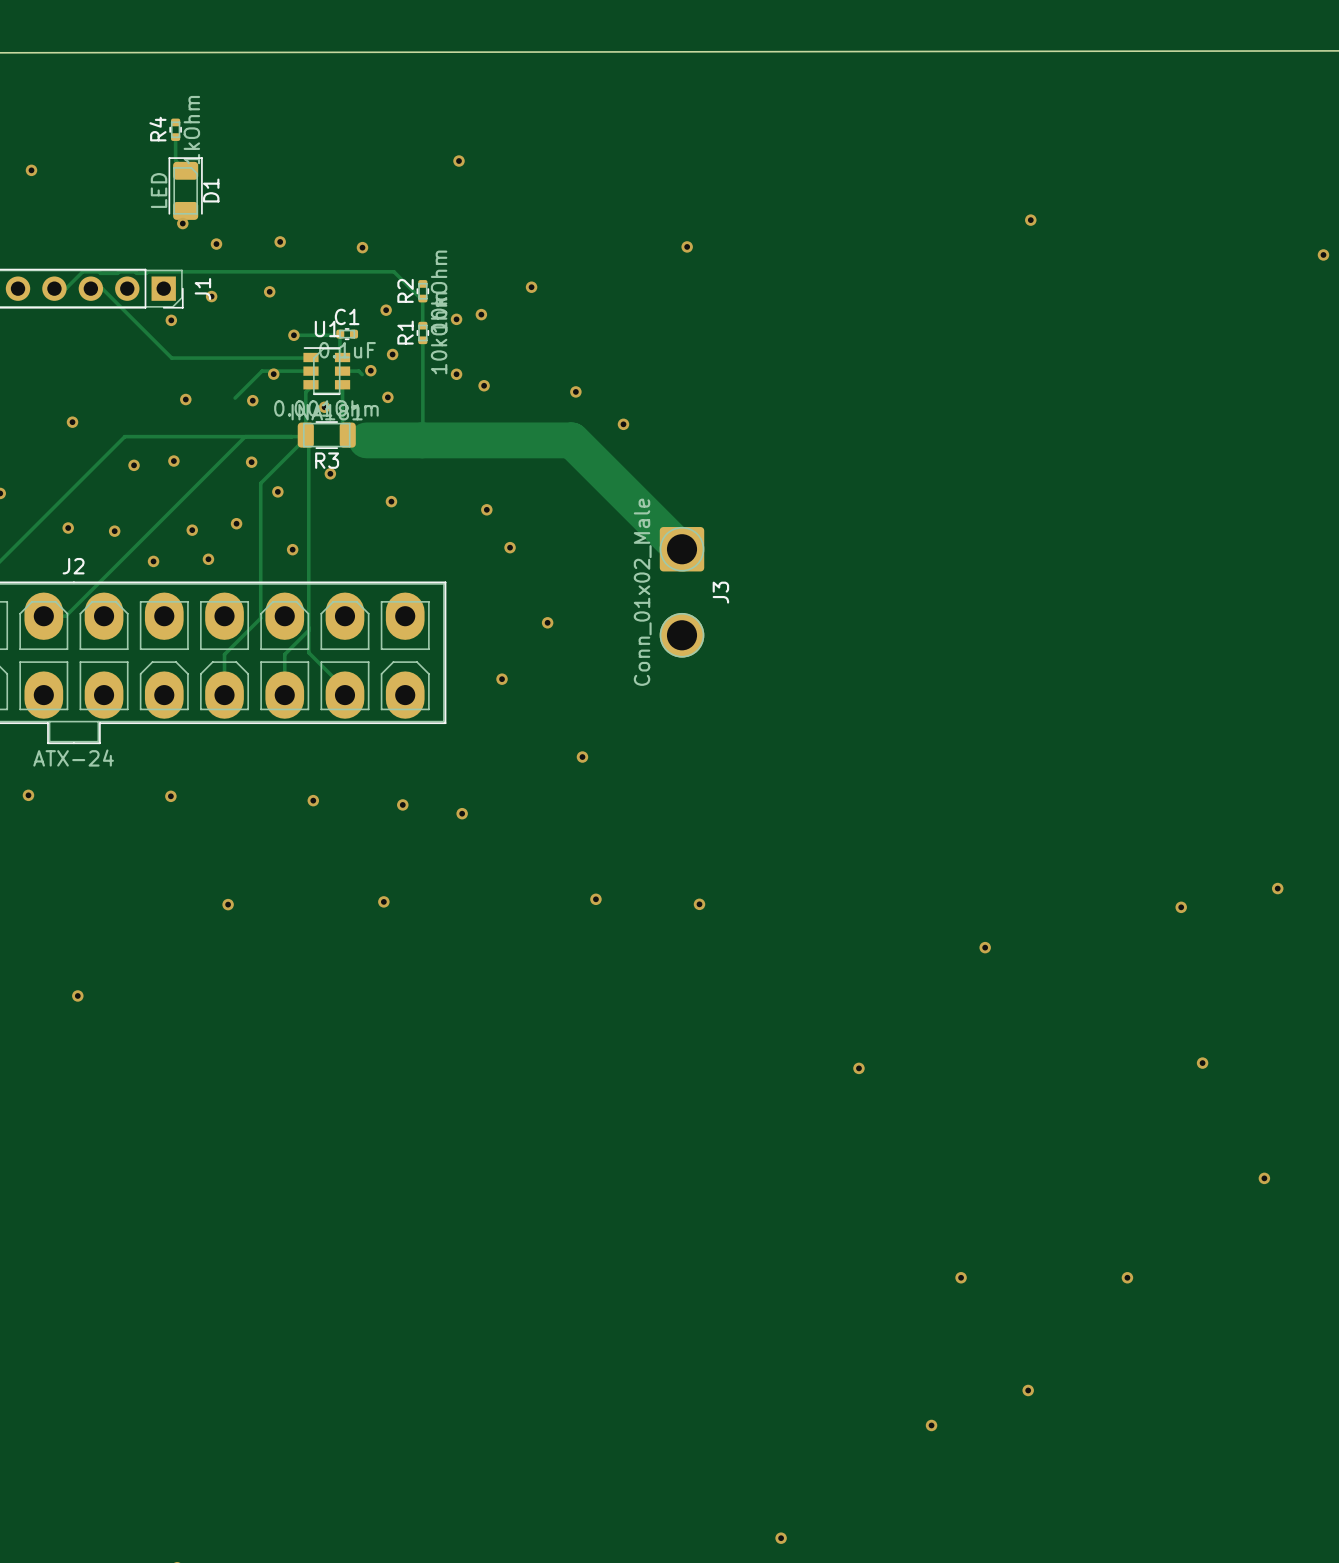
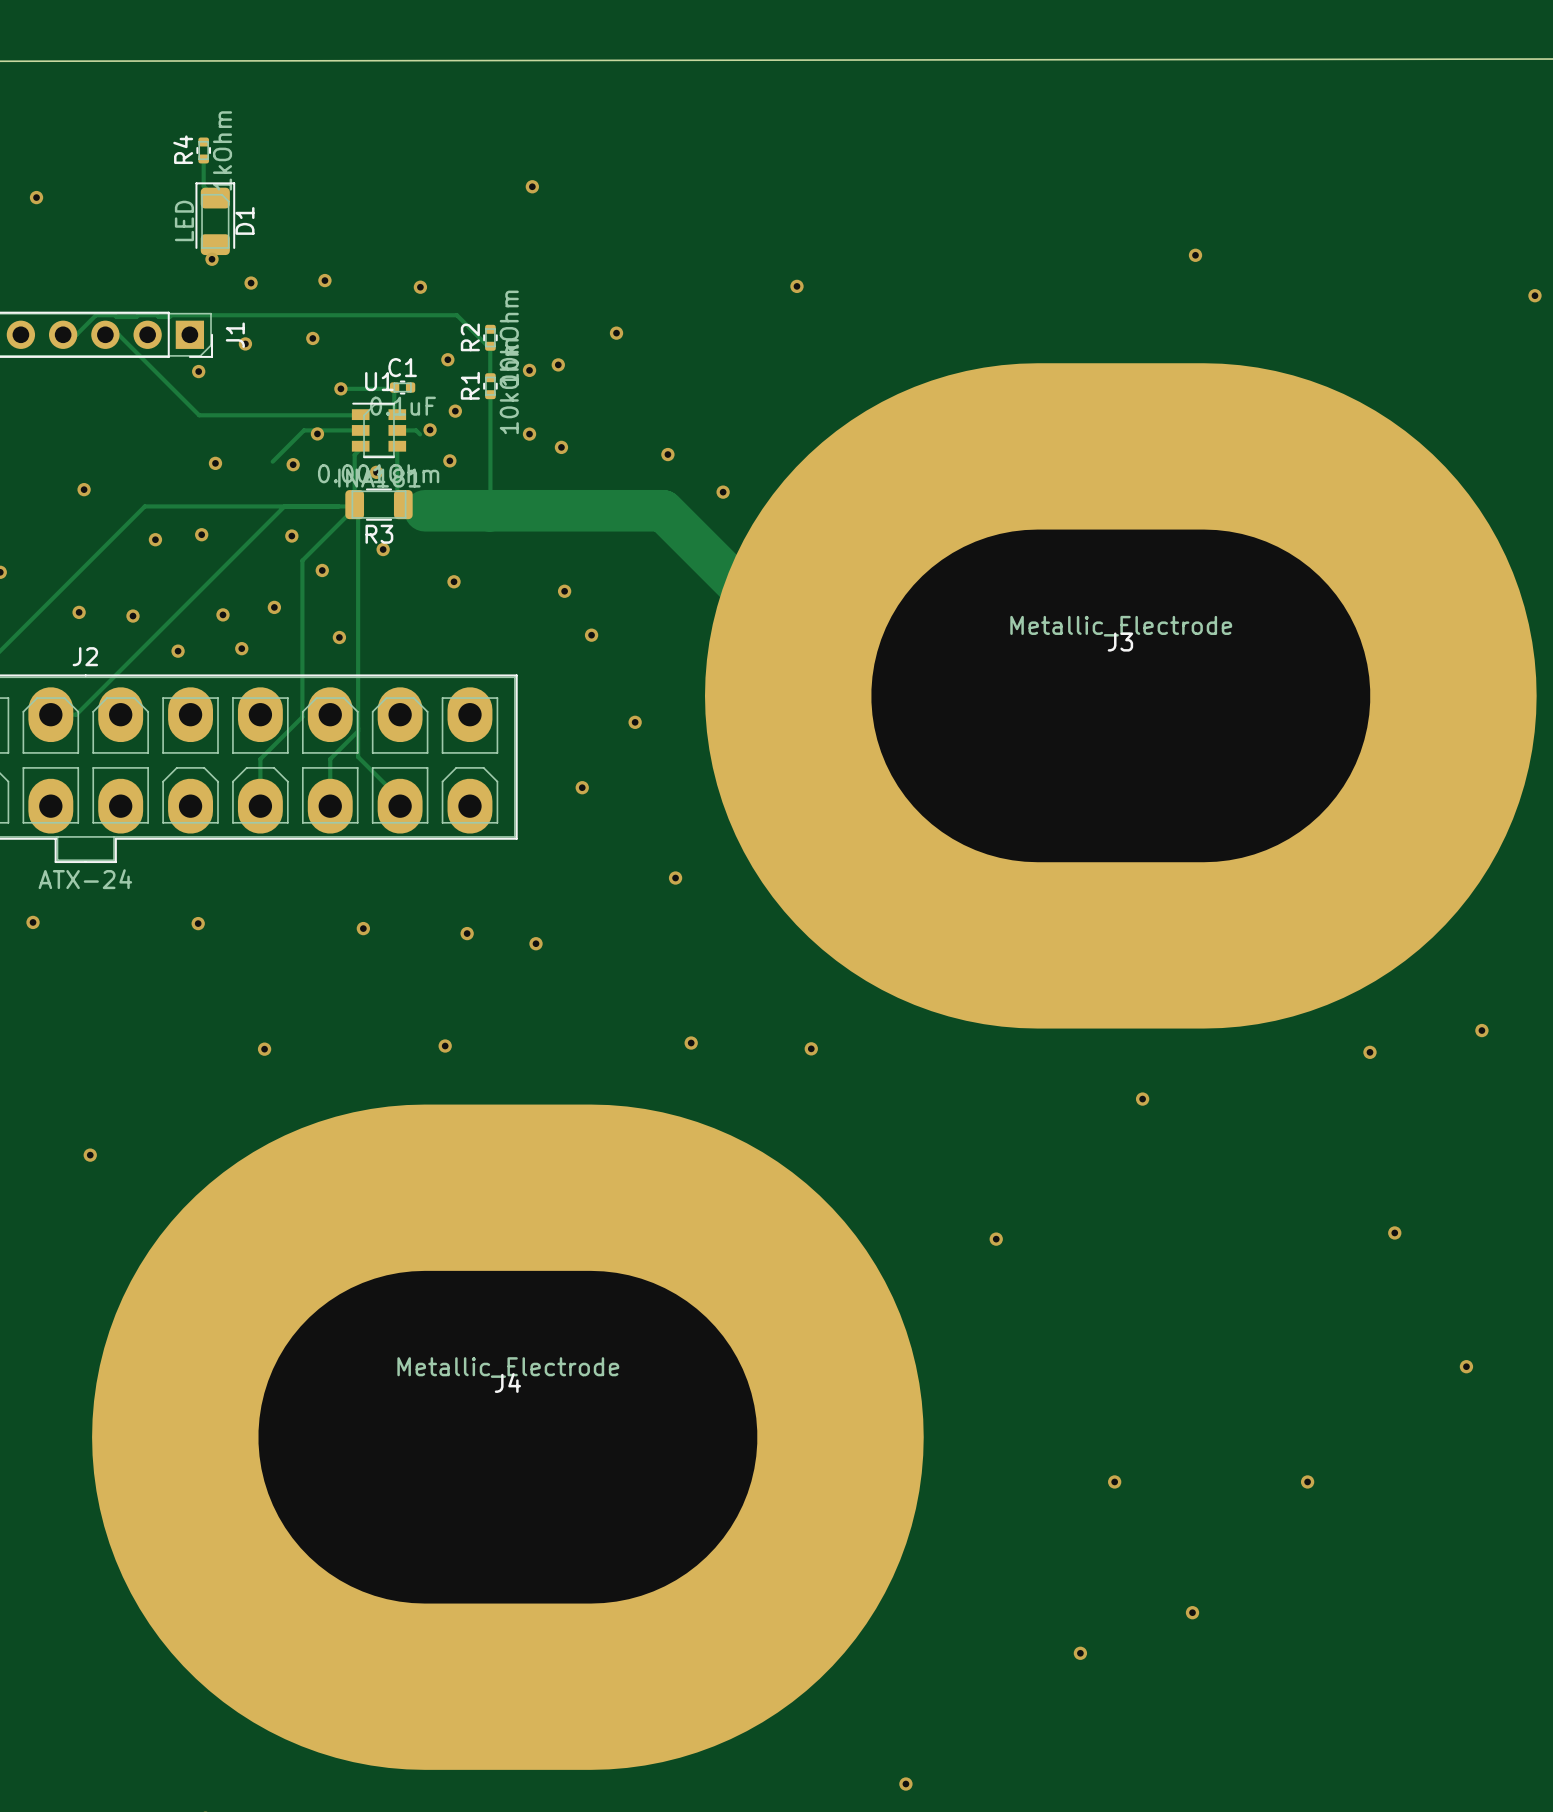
J3 footprint: [659, 527, 705, 658] -> [705, 363, 1537, 1029]
J3 value: Conn_01x02_Male (642, 592) -> Metallic_Electrode (1121, 626)
J3 name position: J3 (720, 592) -> J3 (1120, 642)
J4: none -> Metallic_Electrode (507, 1437)

